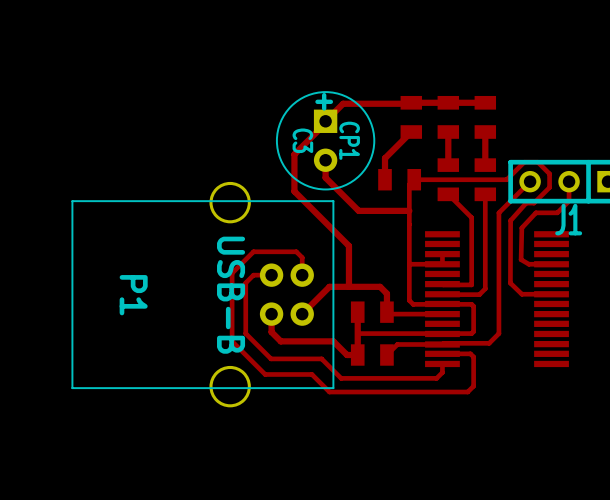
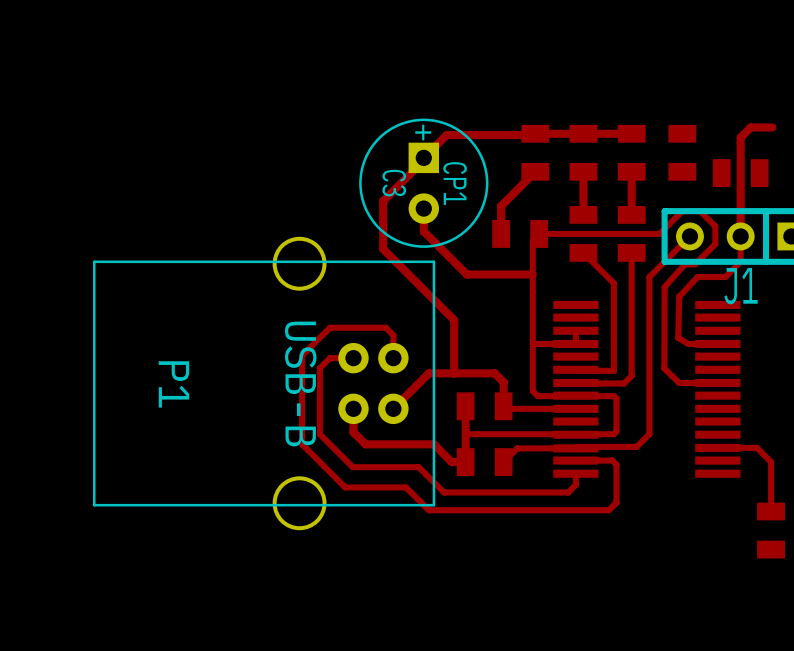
top track: none -> (772, 127) (750, 127) (740, 137) (740, 236)
part: none -> (682, 152)
part: none -> (740, 173)
top track: none -> (717, 447) (756, 447) (771, 462) (771, 511)
part: none -> (771, 530)

